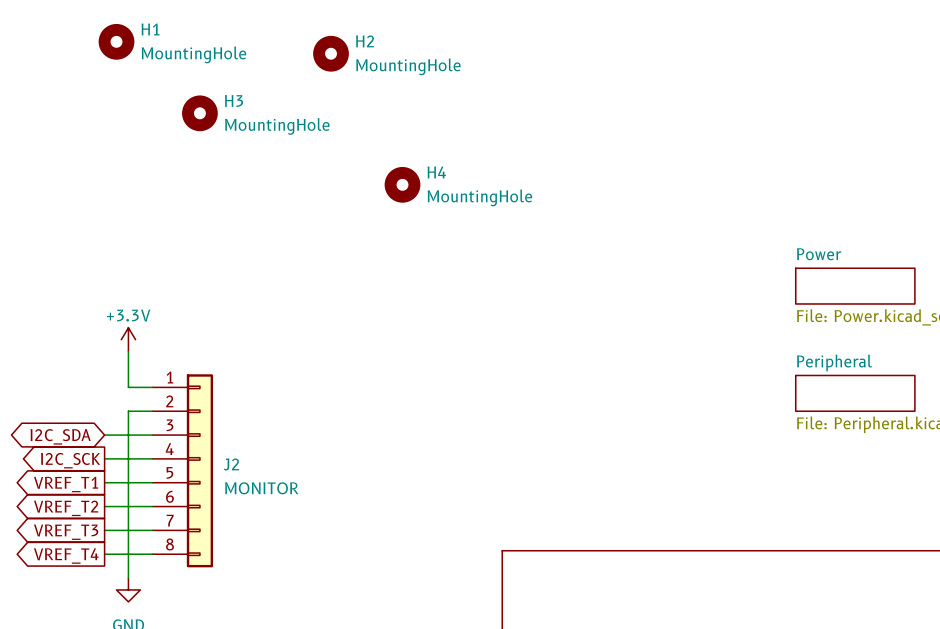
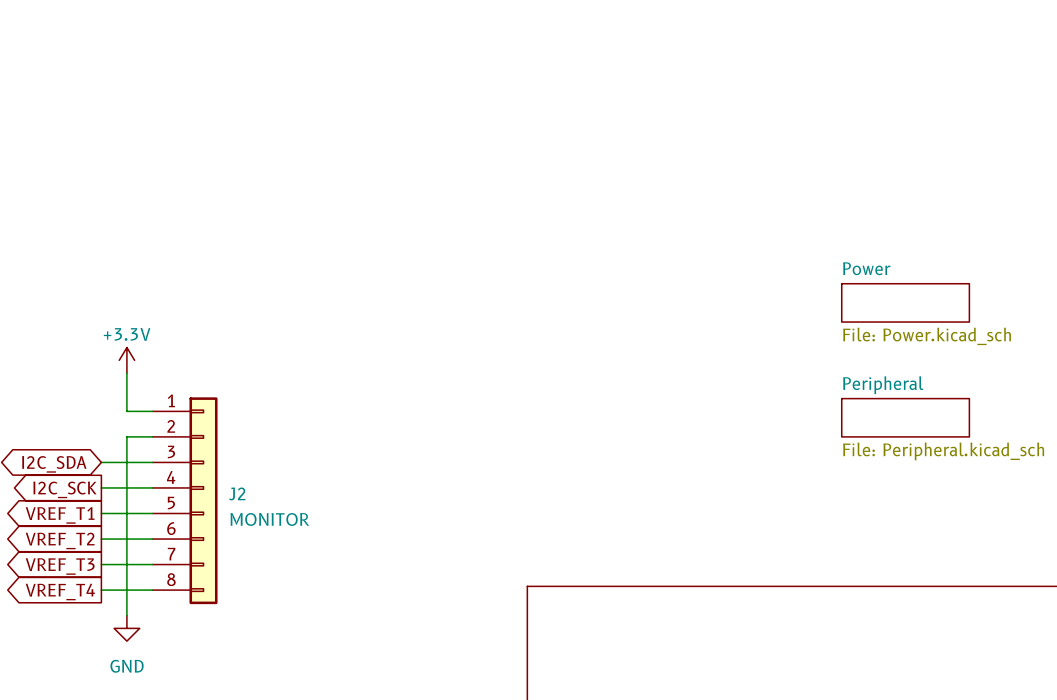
H1: MountingHole (116, 41) -> none
H2: MountingHole (331, 53) -> none
H3: MountingHole (199, 113) -> none
H4: MountingHole (402, 184) -> none

